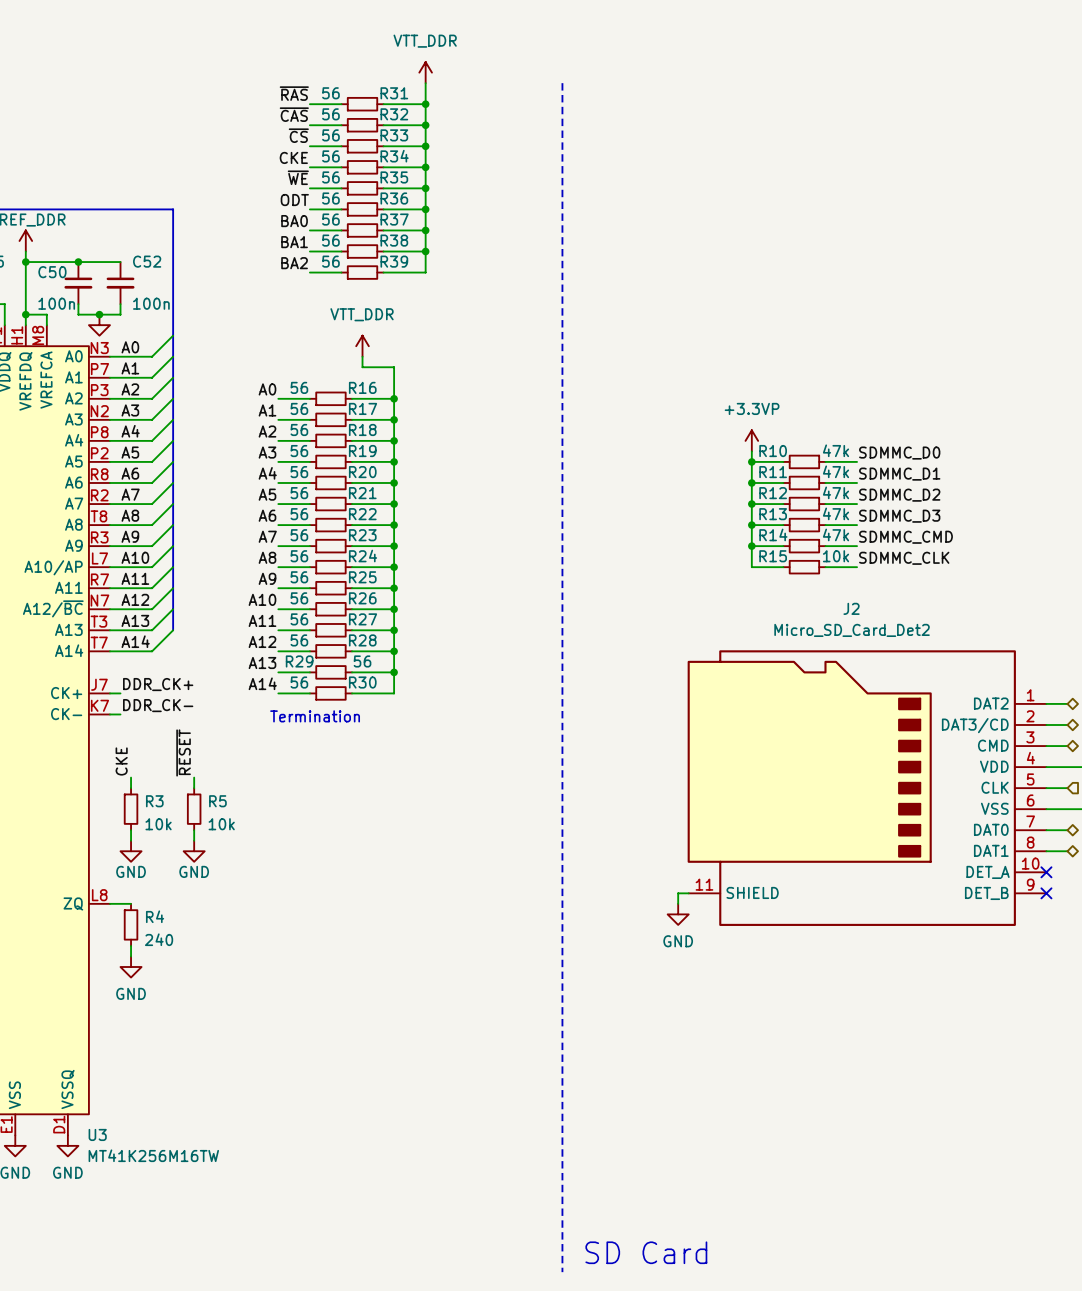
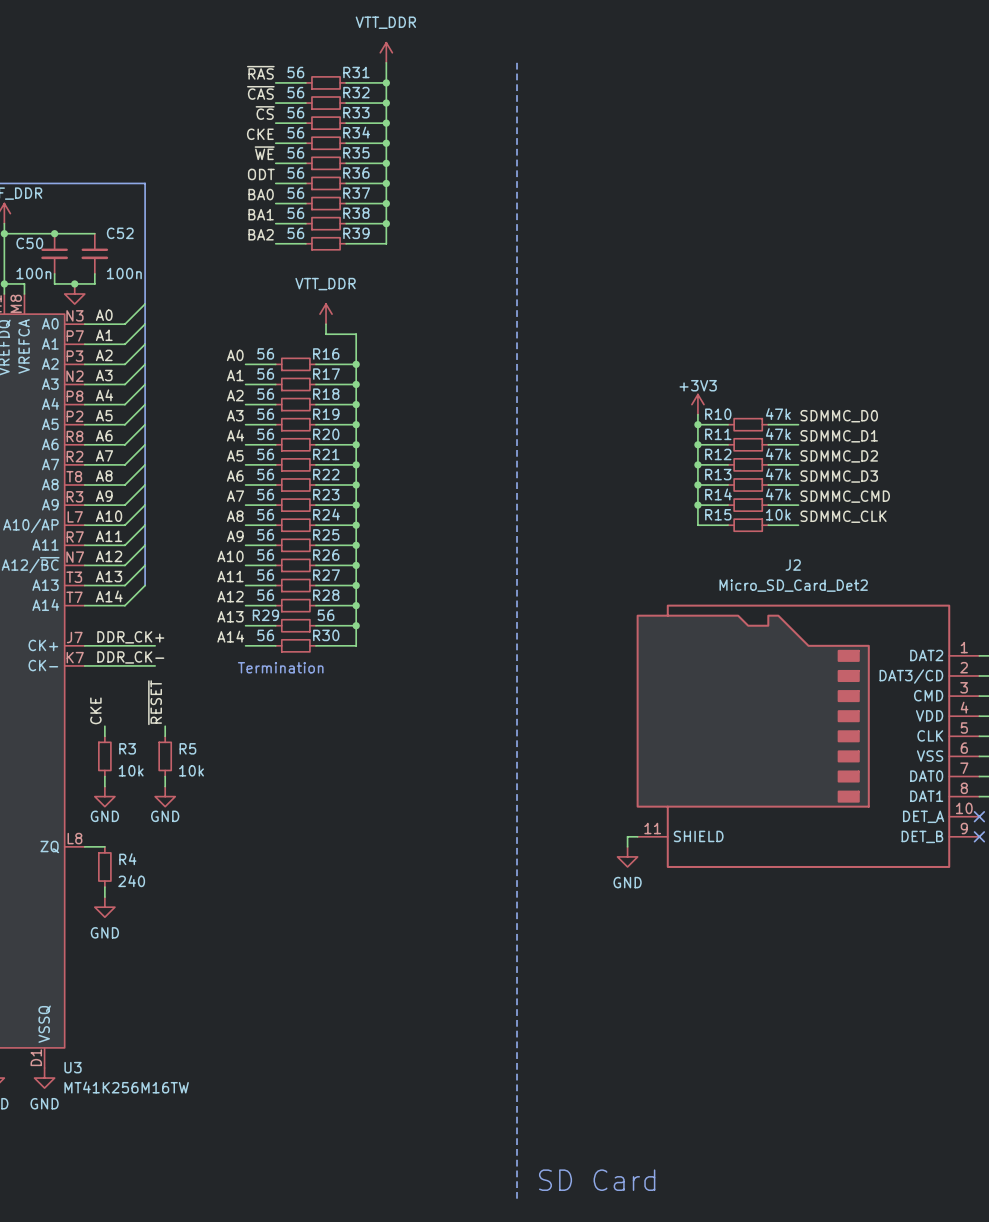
power symbol: +3.3VP (751, 440) -> +3V3 (697, 404)
wire: none -> (94, 645) (155, 645)
wire: none -> (94, 665) (155, 665)

